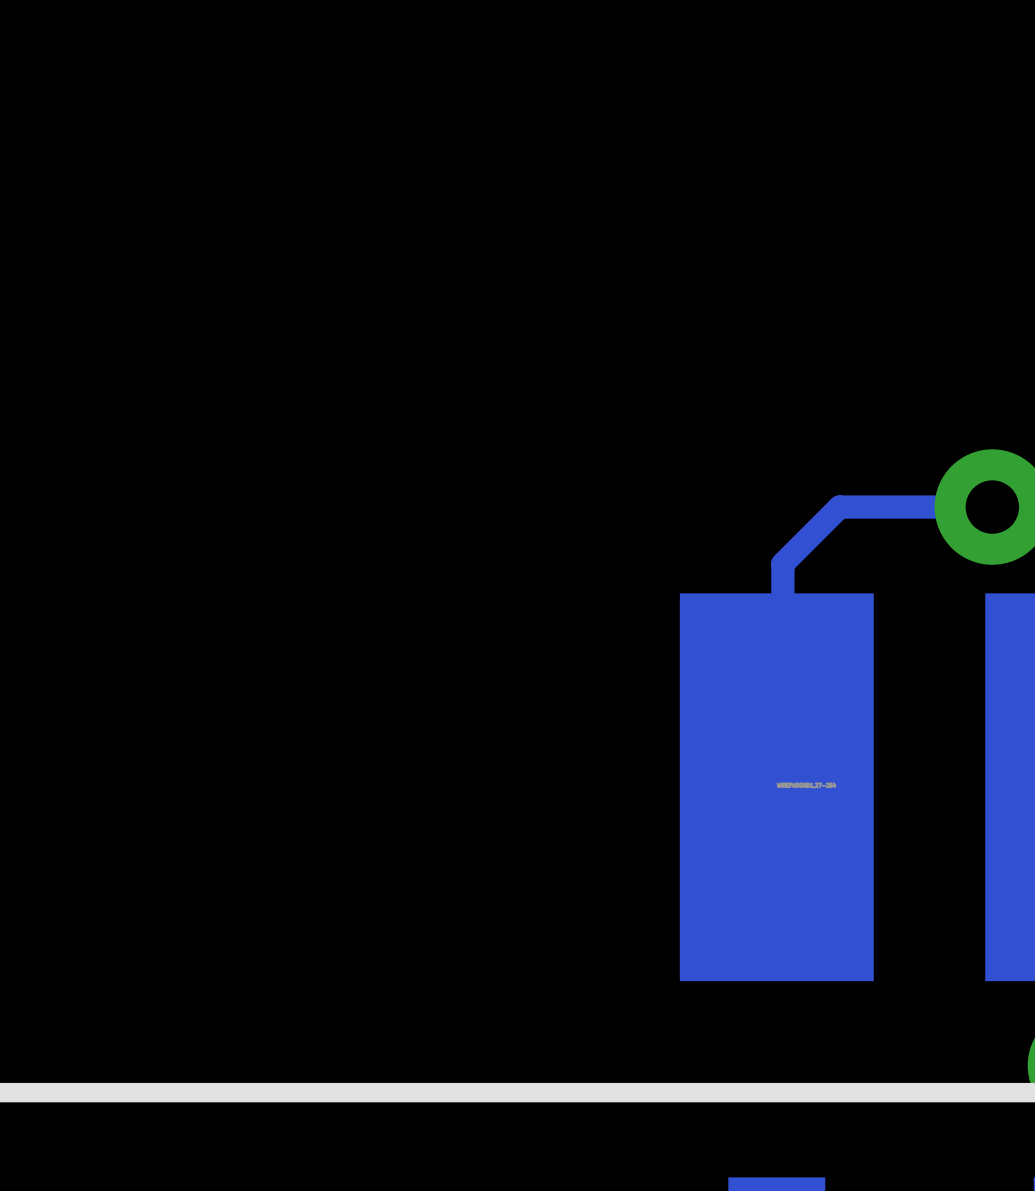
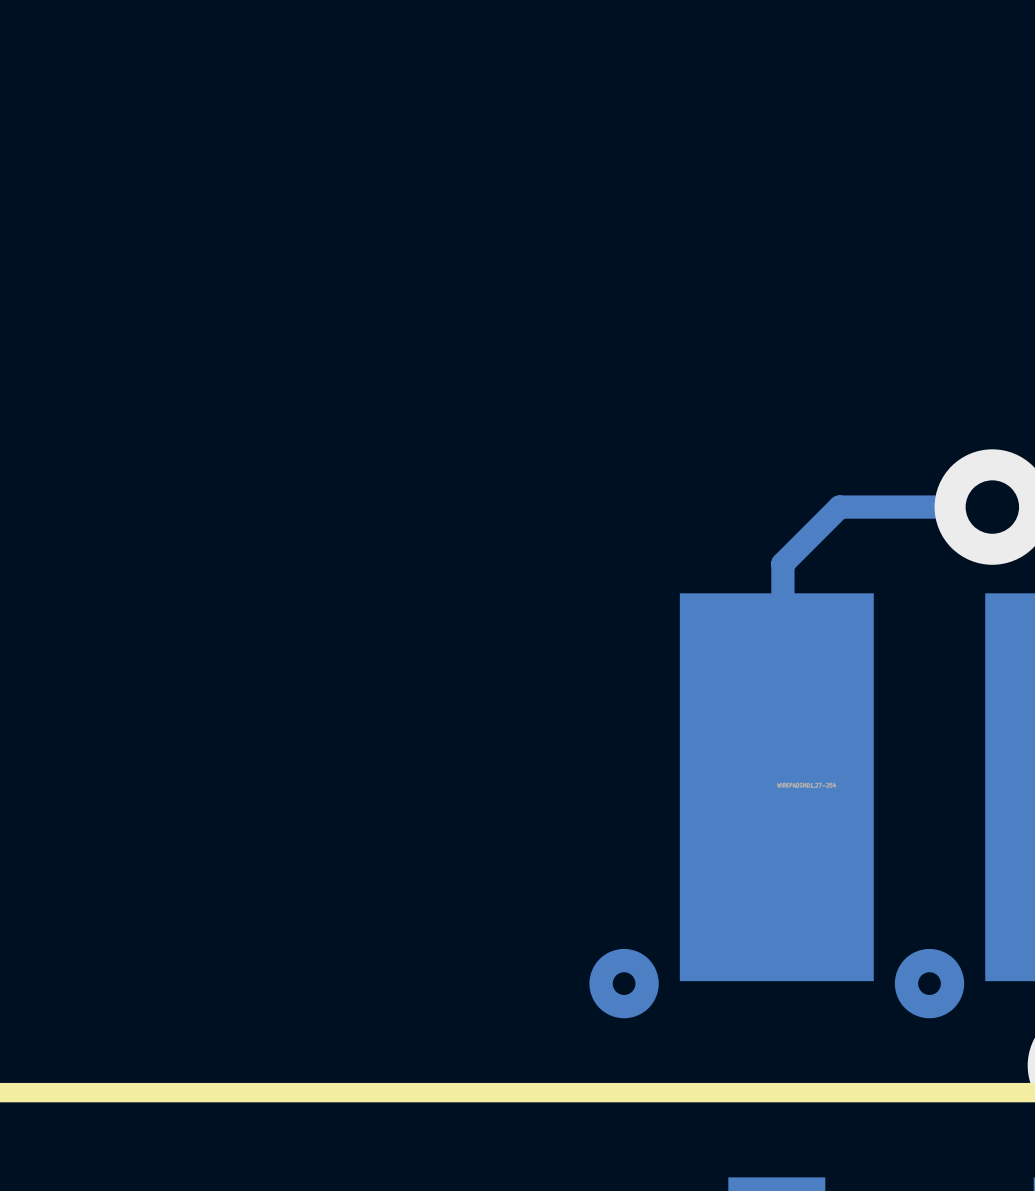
drawing: none -> [589, 948, 659, 1019]
drawing: none -> [894, 948, 965, 1019]

